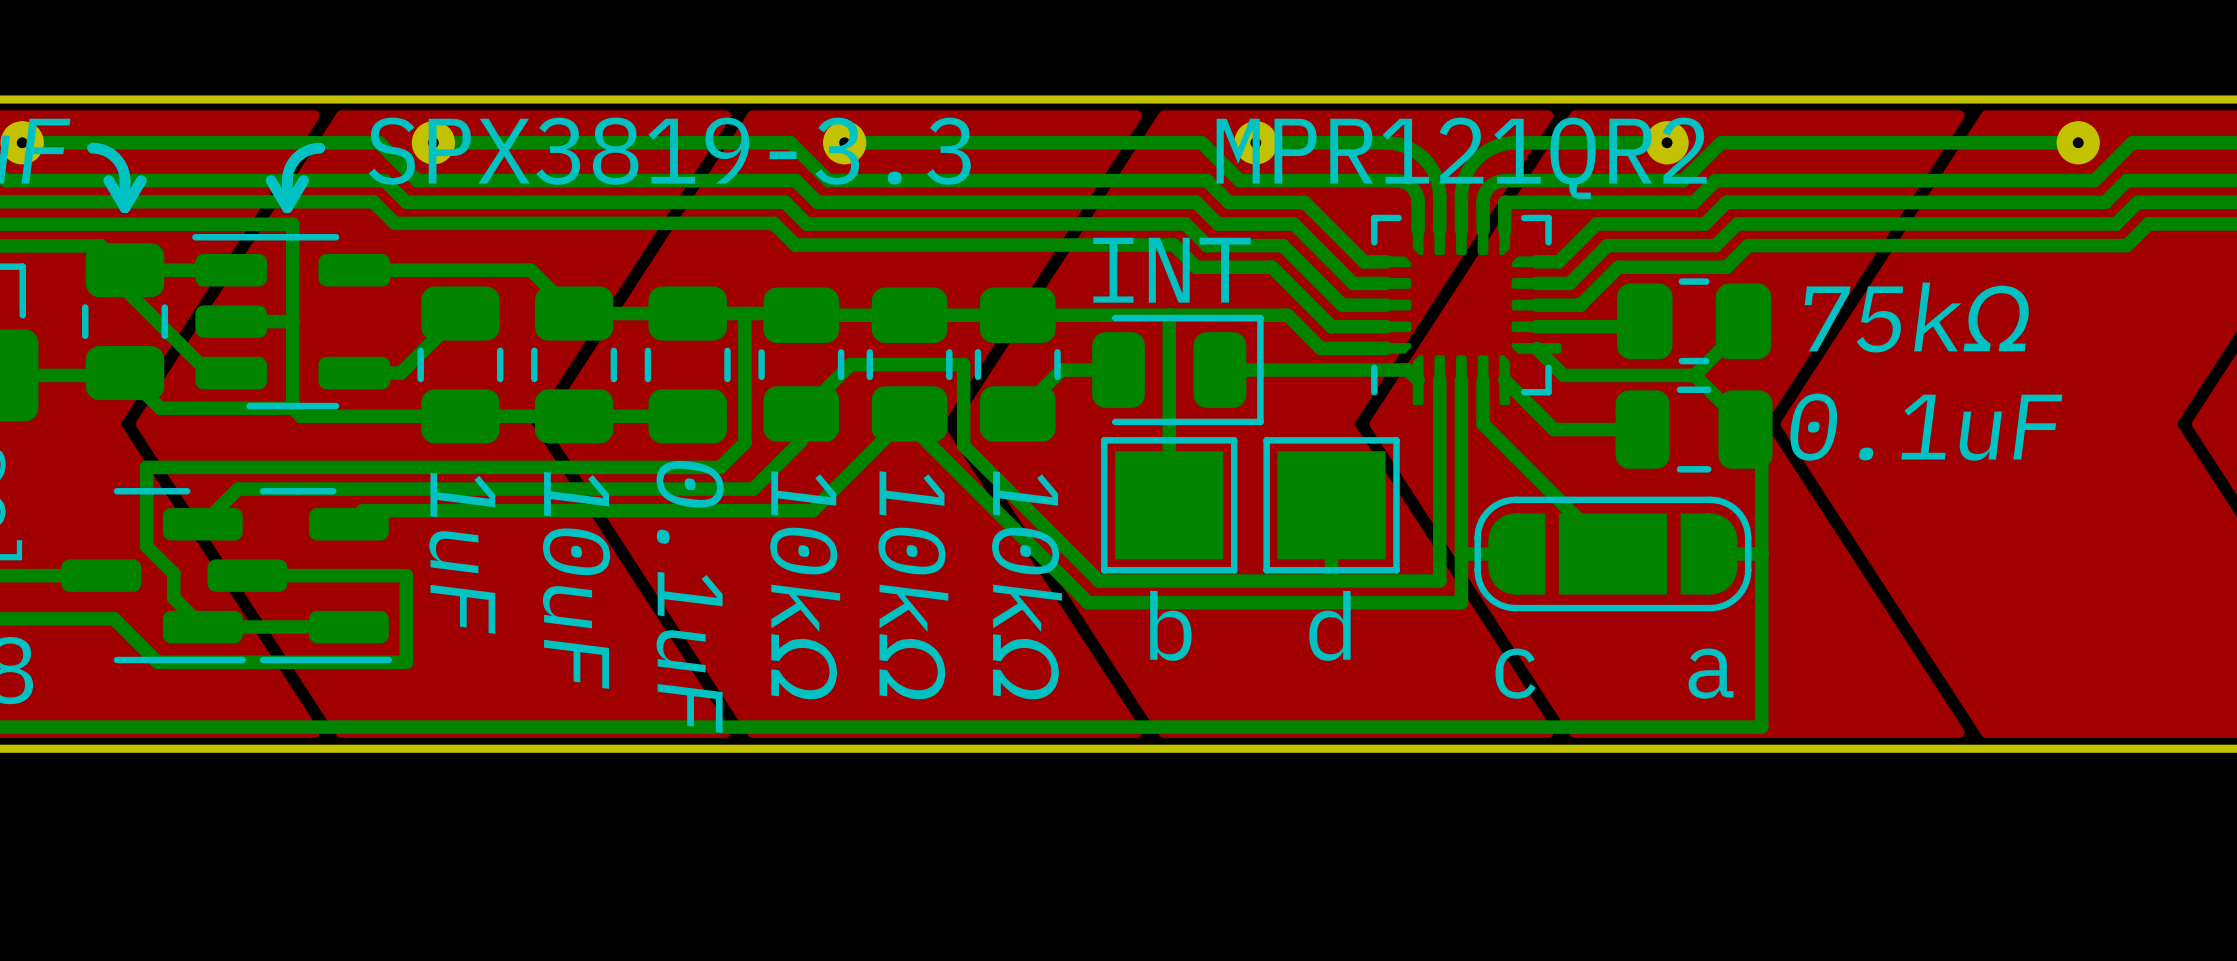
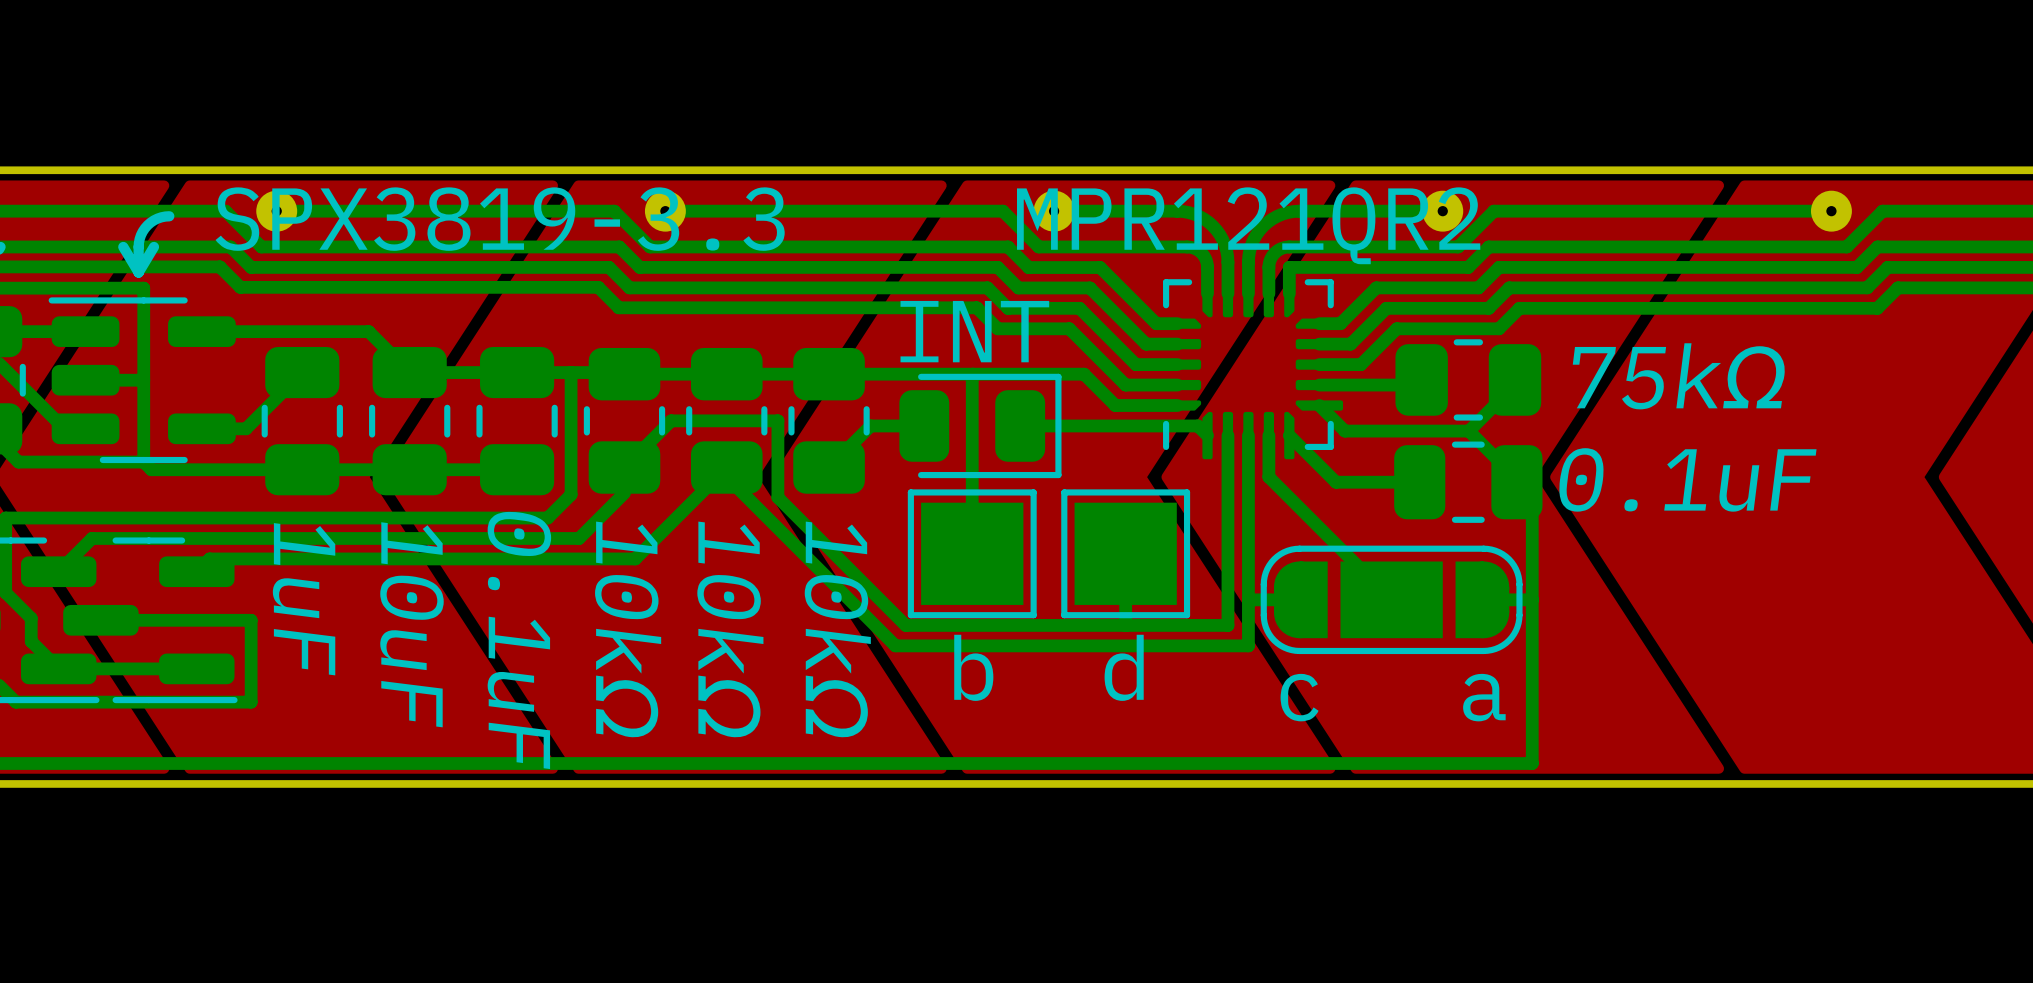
part text position: c (1515, 673) -> c (1299, 697)
part text position: a (1711, 673) -> a (1484, 697)

